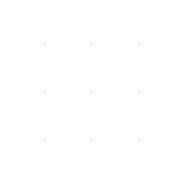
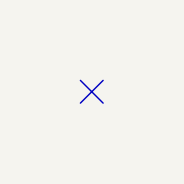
no-connect mark: none -> (91, 91)

